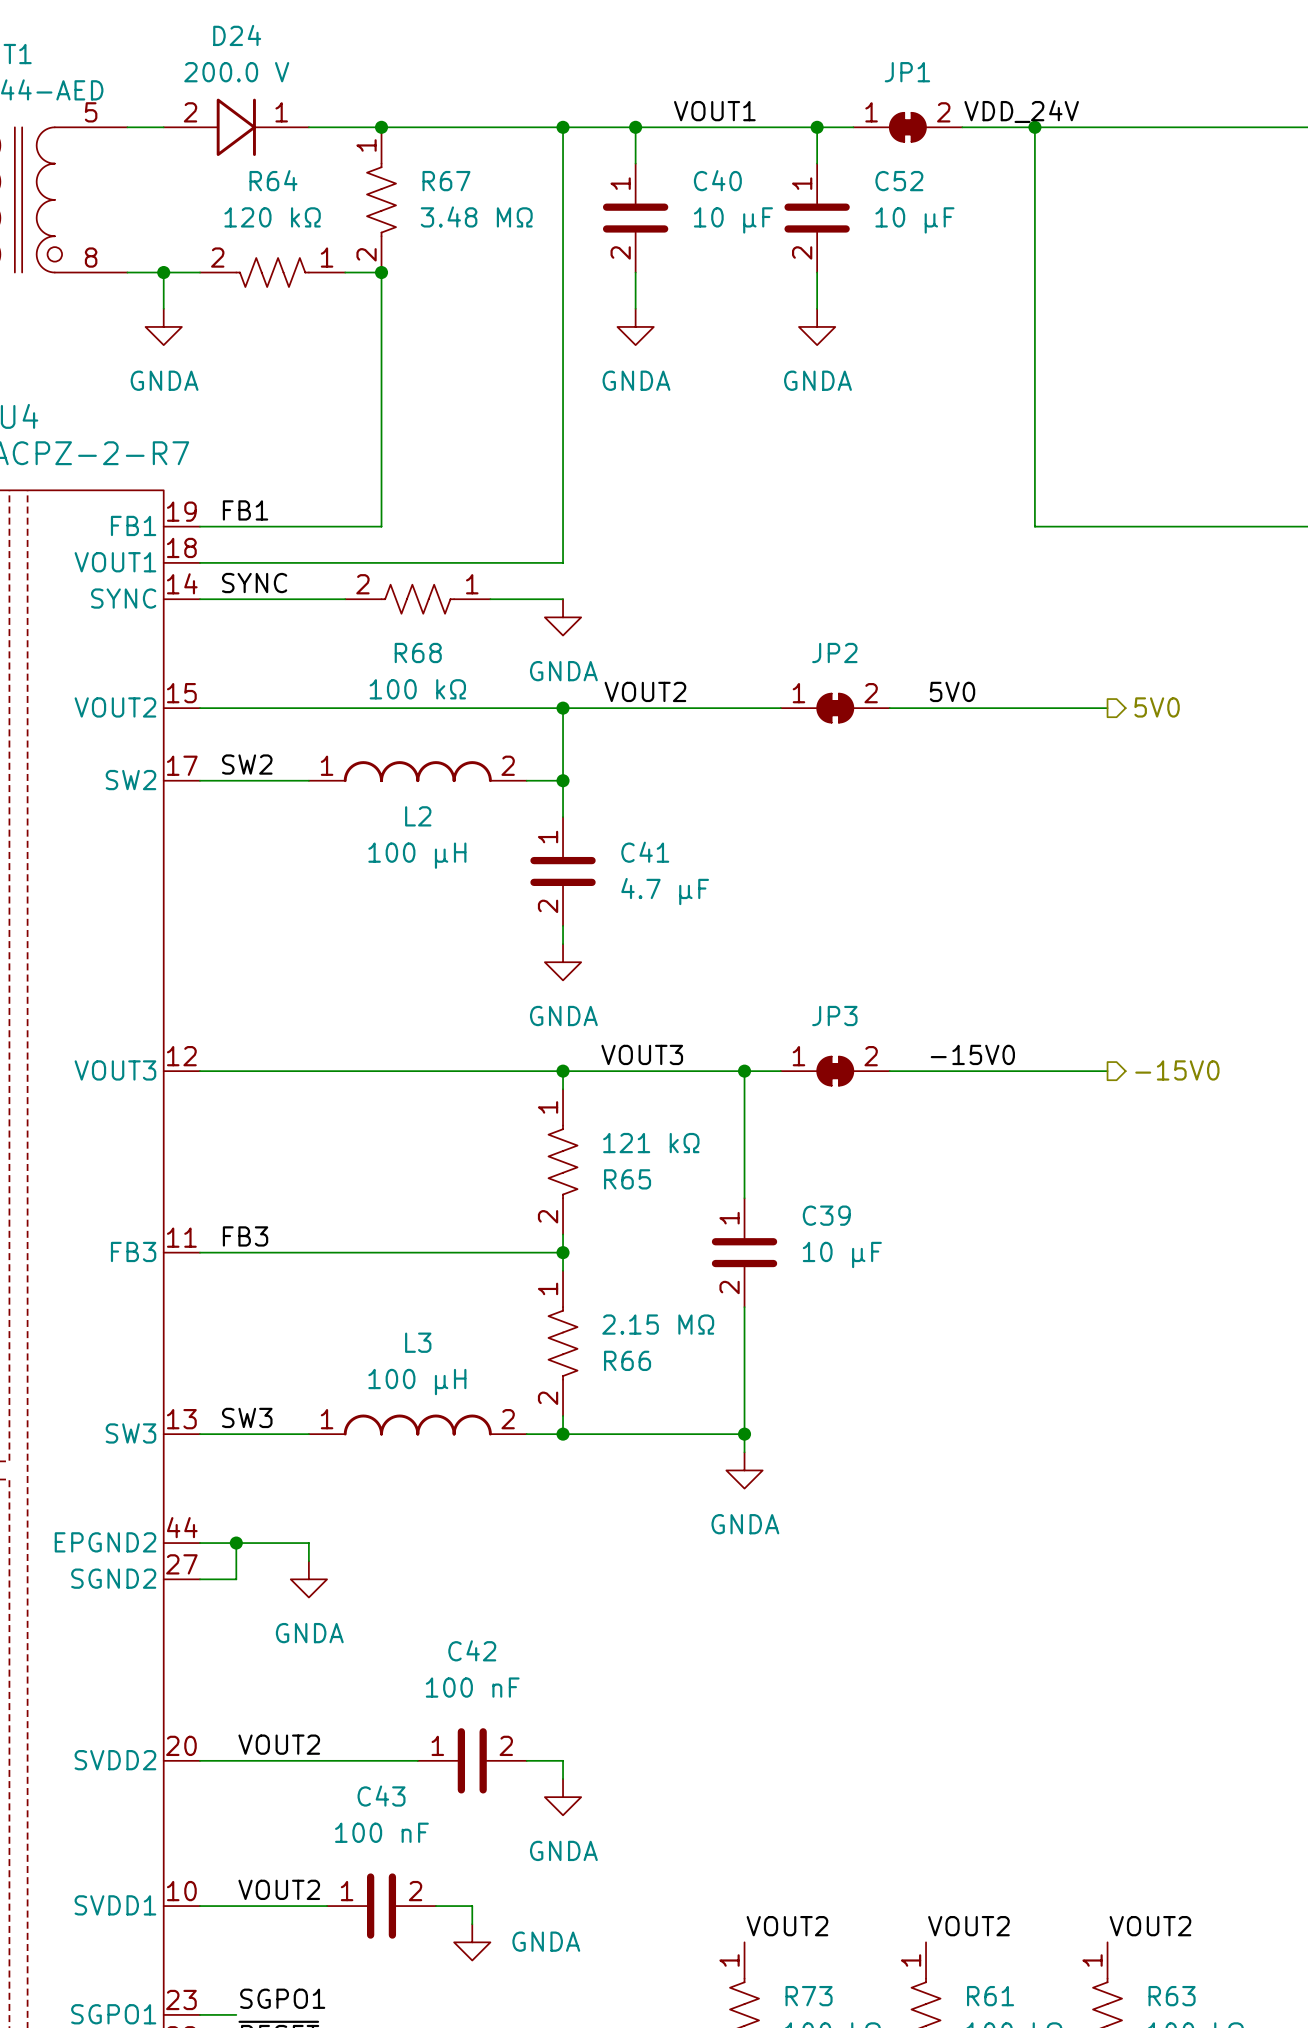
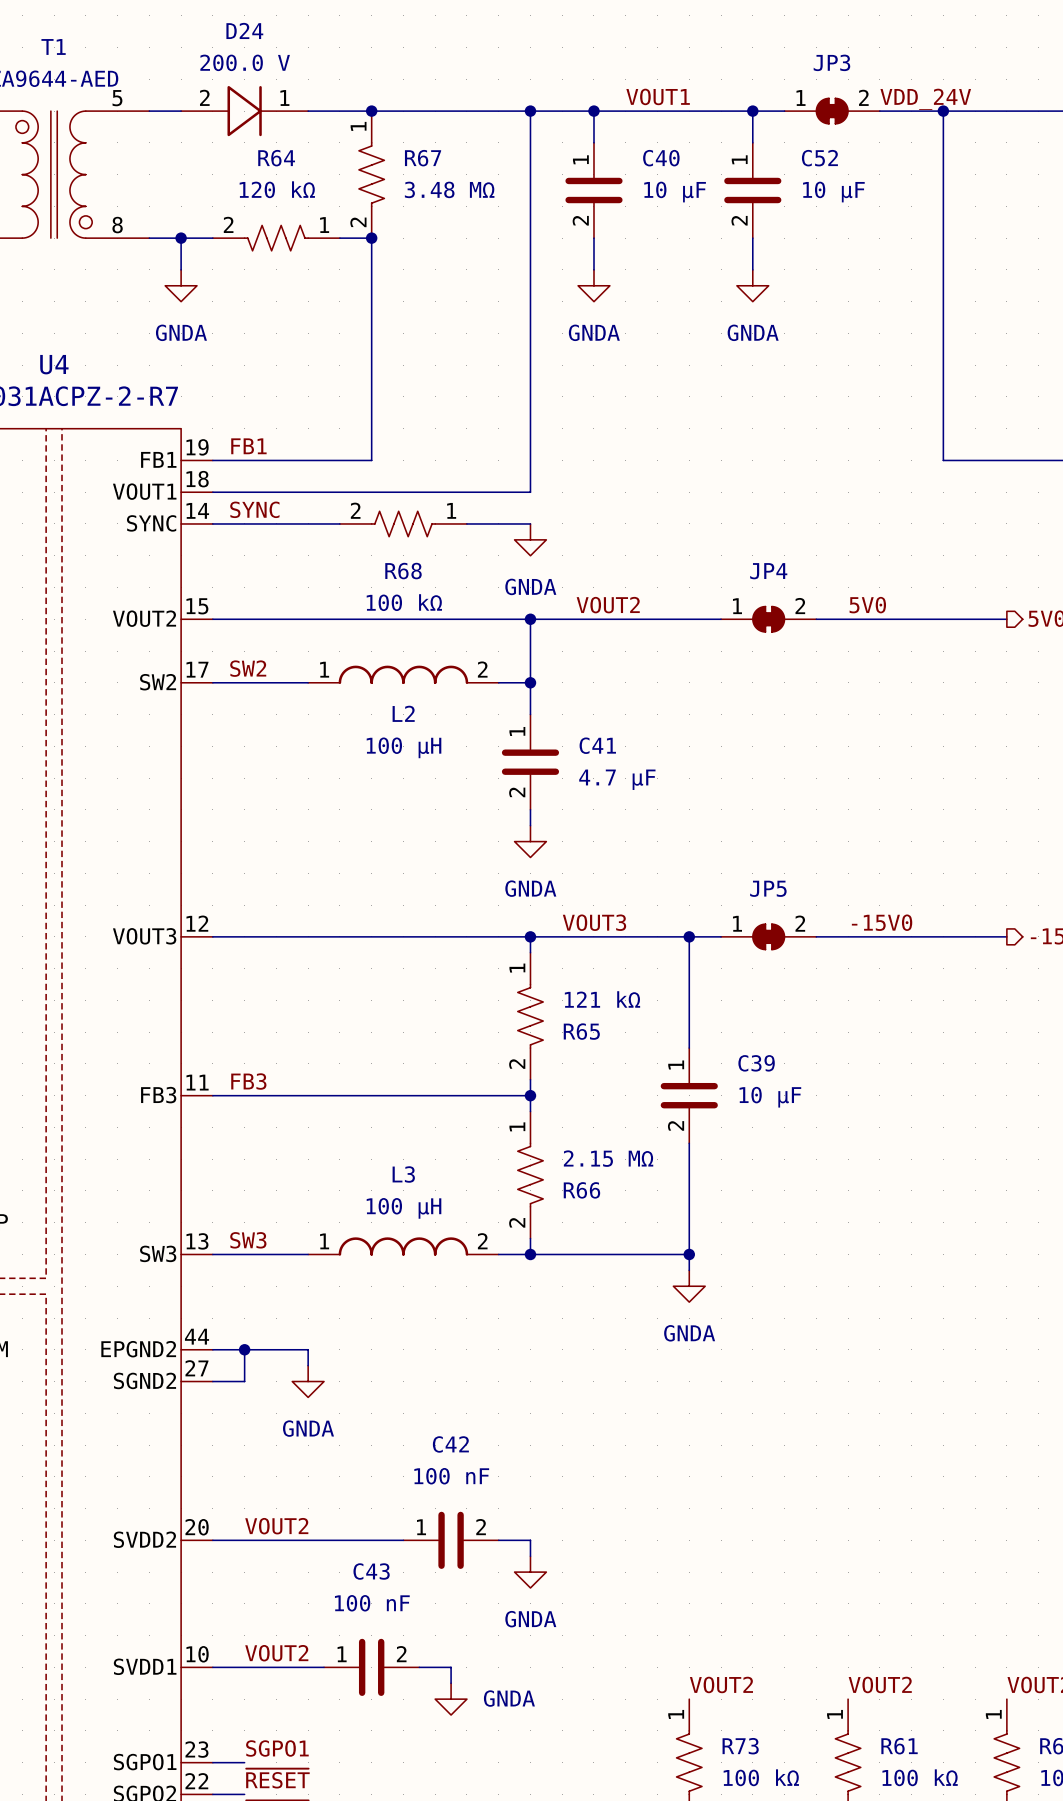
JP1 name: JP1 (907, 72) -> JP3 (831, 62)
JP2 name: JP2 (834, 653) -> JP4 (768, 571)
JP3 name: JP3 (834, 1016) -> JP5 (768, 888)

